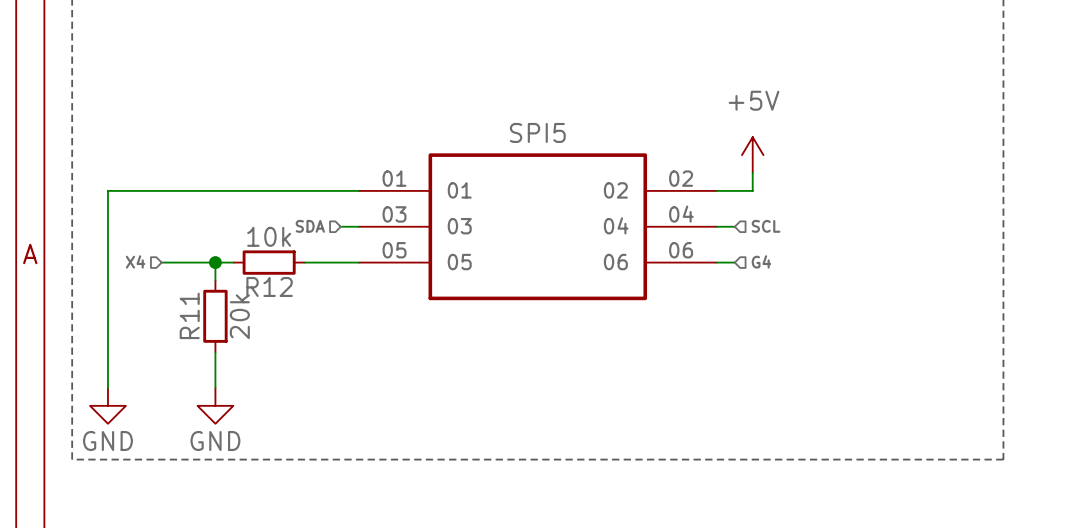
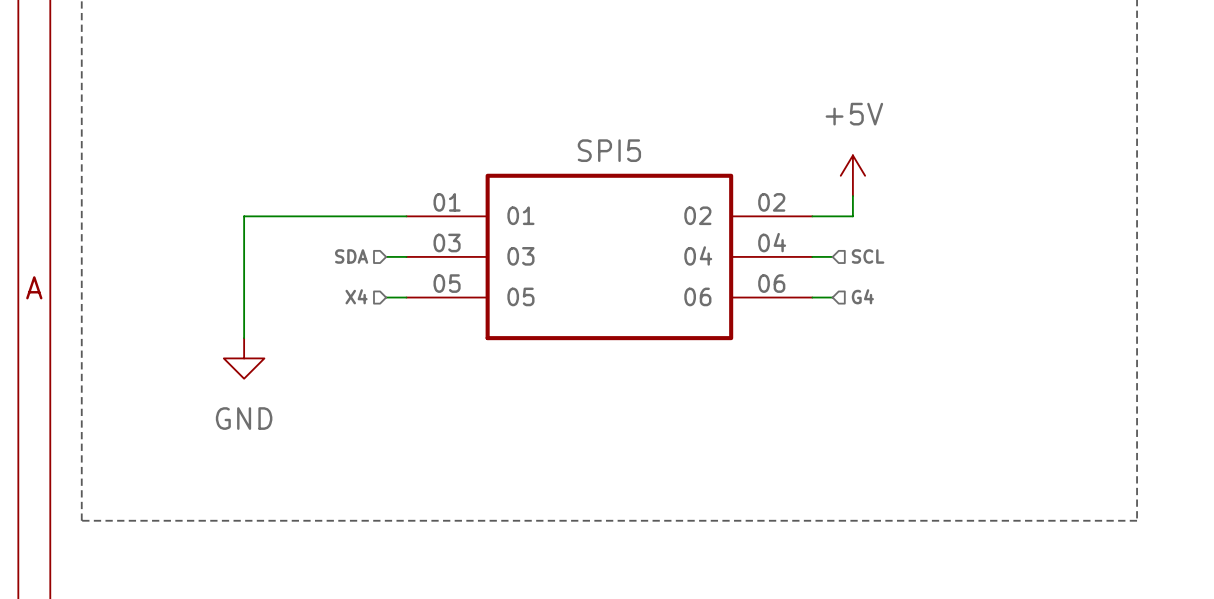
wire: (215, 190) (107, 190) (107, 387) -> (244, 216) (244, 297)
hierarchical label position: X4 (135, 261) -> X4 (356, 296)
wire: (161, 262) (233, 262) -> none
junction: (215, 262) -> none
R12: 10k (269, 262) -> none
wire: (304, 262) (340, 262) -> none
power symbol: none -> GND (244, 358)
R11: 20k (215, 316) -> none
wire: (215, 352) (215, 387) -> none
power symbol: GND (107, 405) -> none
power symbol: GND (215, 405) -> none

